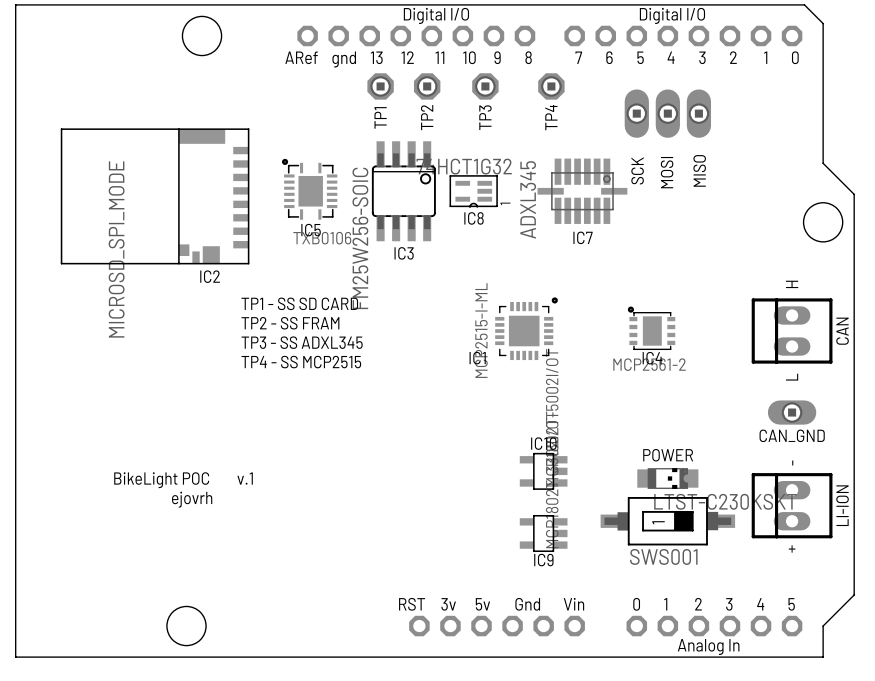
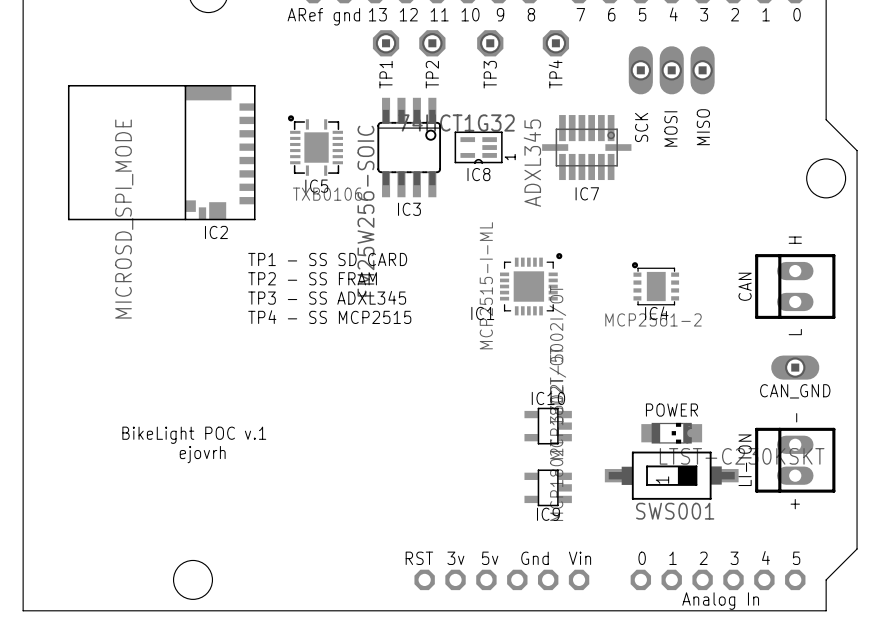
CAN name position: CAN (842, 331) -> CAN (745, 286)
LI-ION name position: LI-ION (842, 505) -> LI-ION (745, 460)

